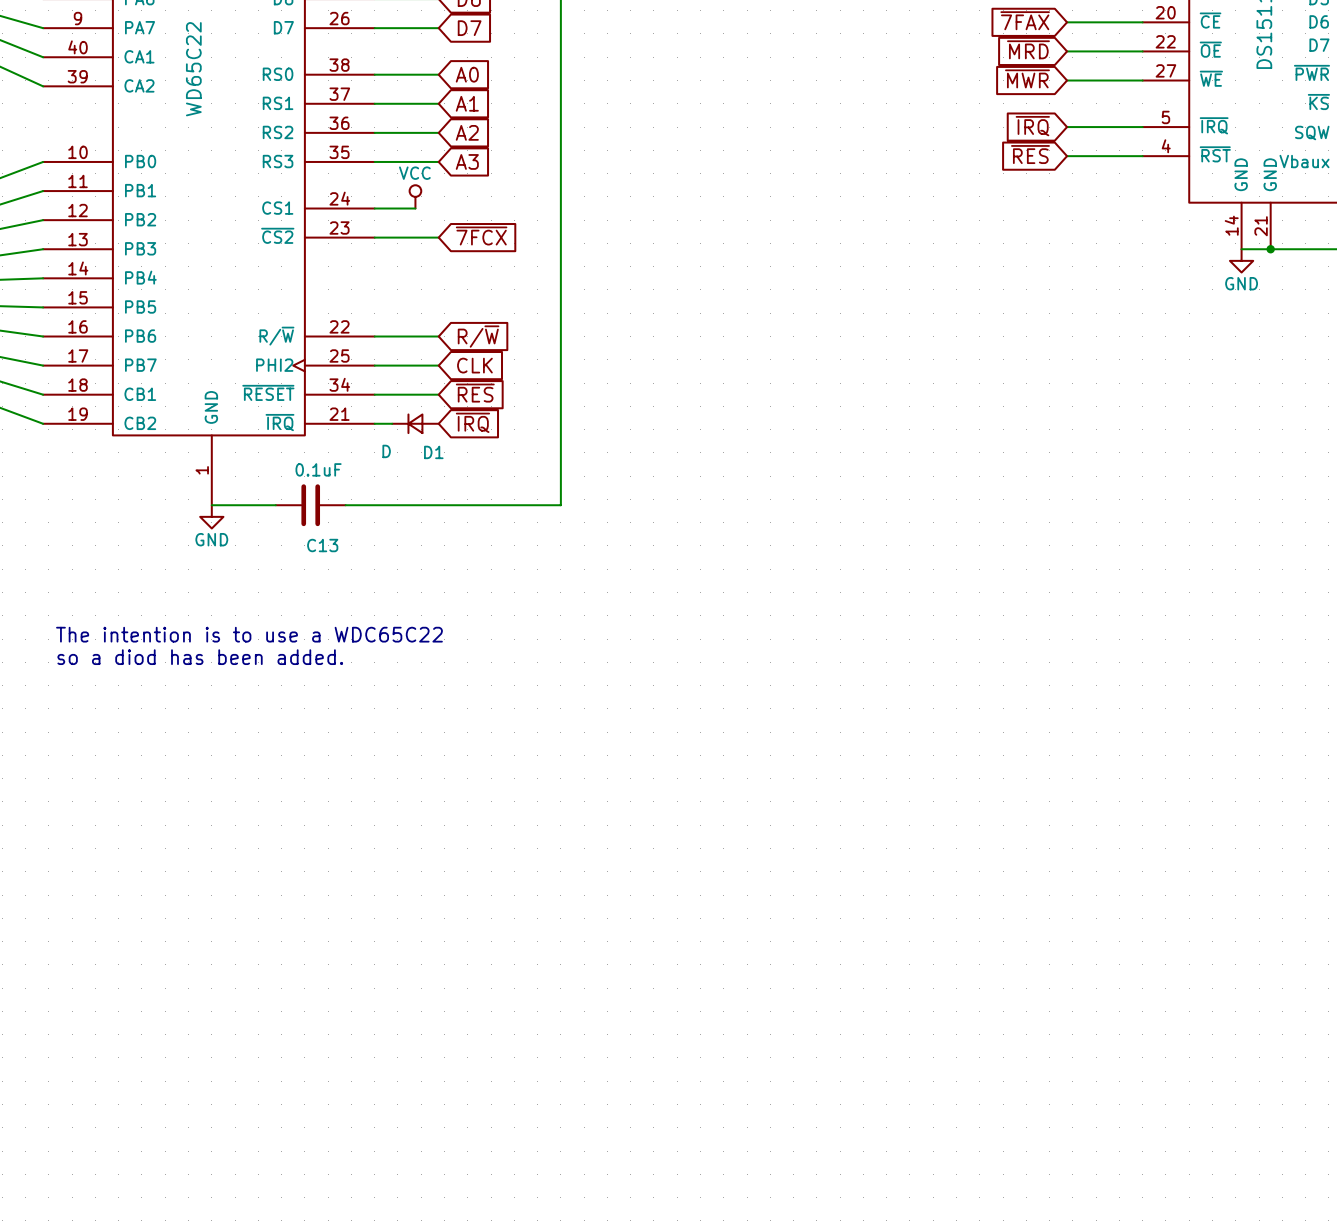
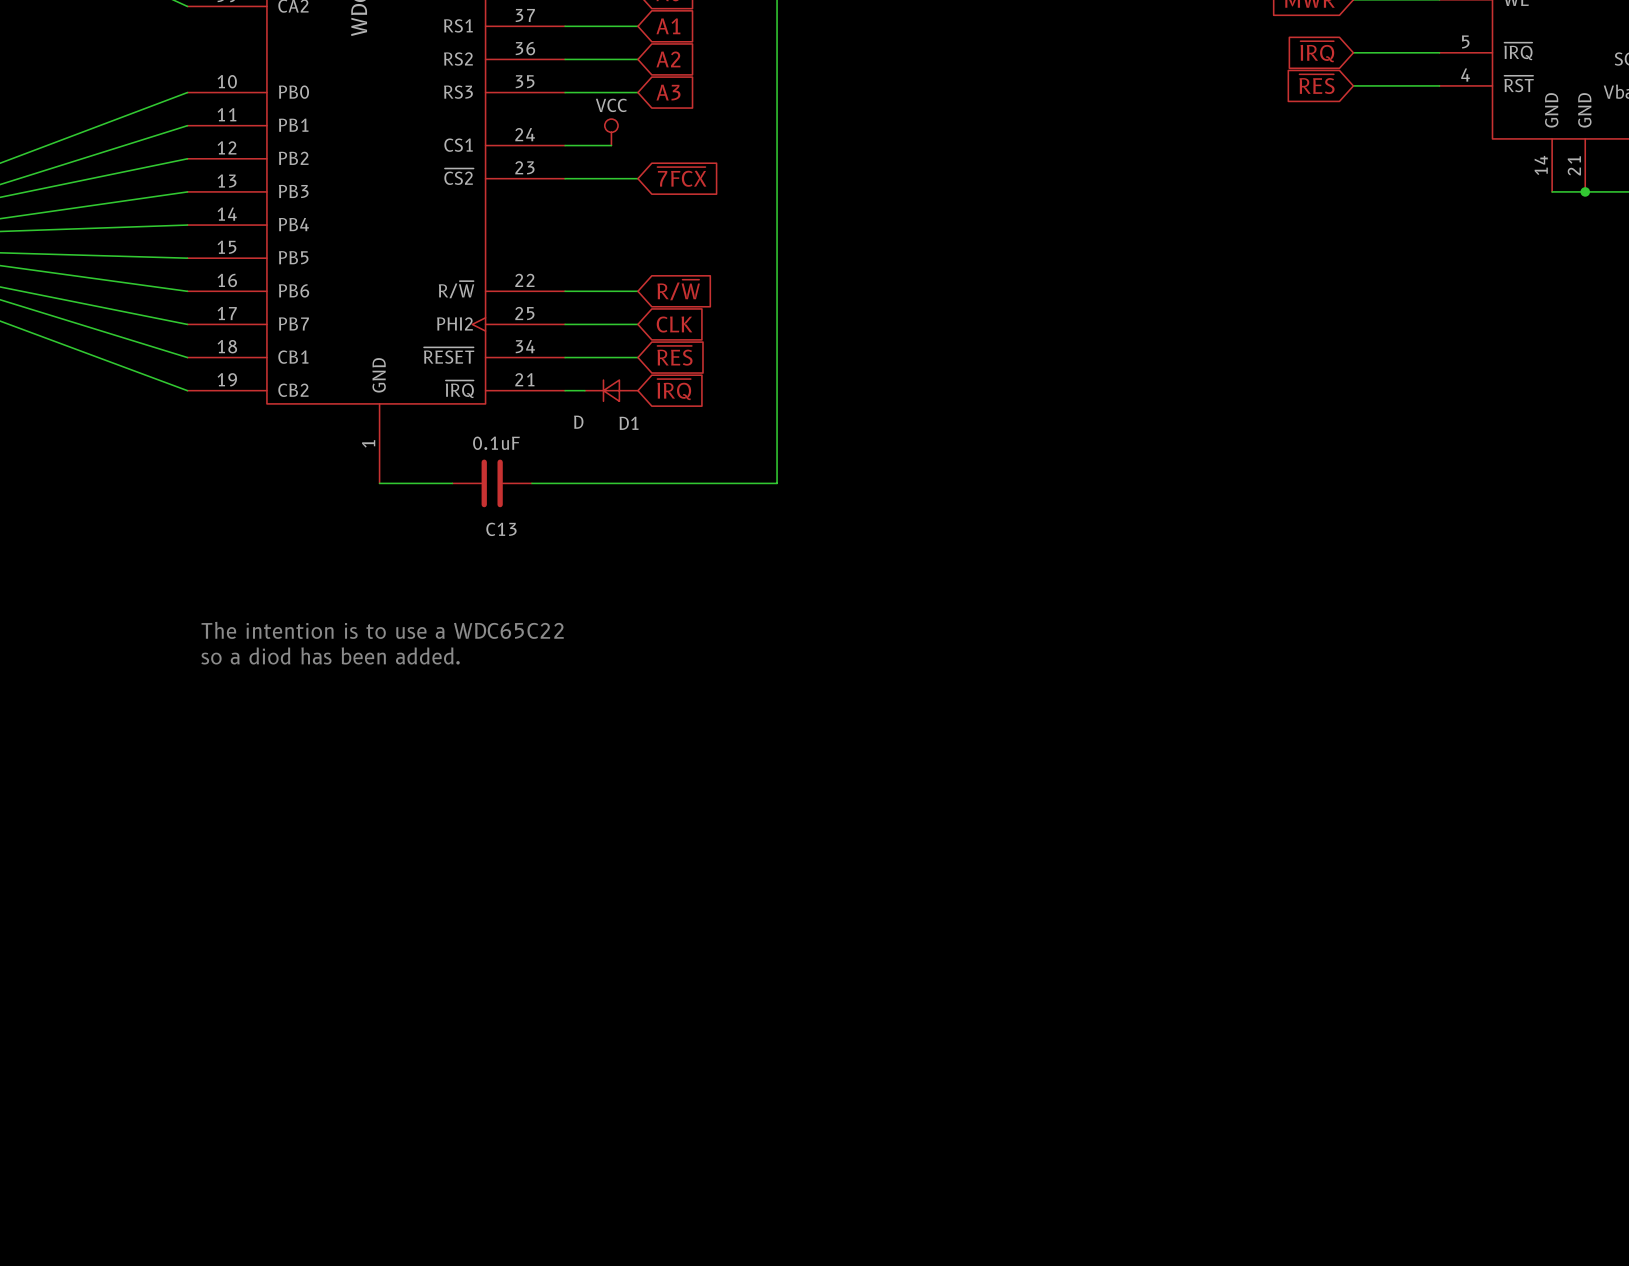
power symbol: GND (1241, 260) -> none
power symbol: GND (211, 516) -> none

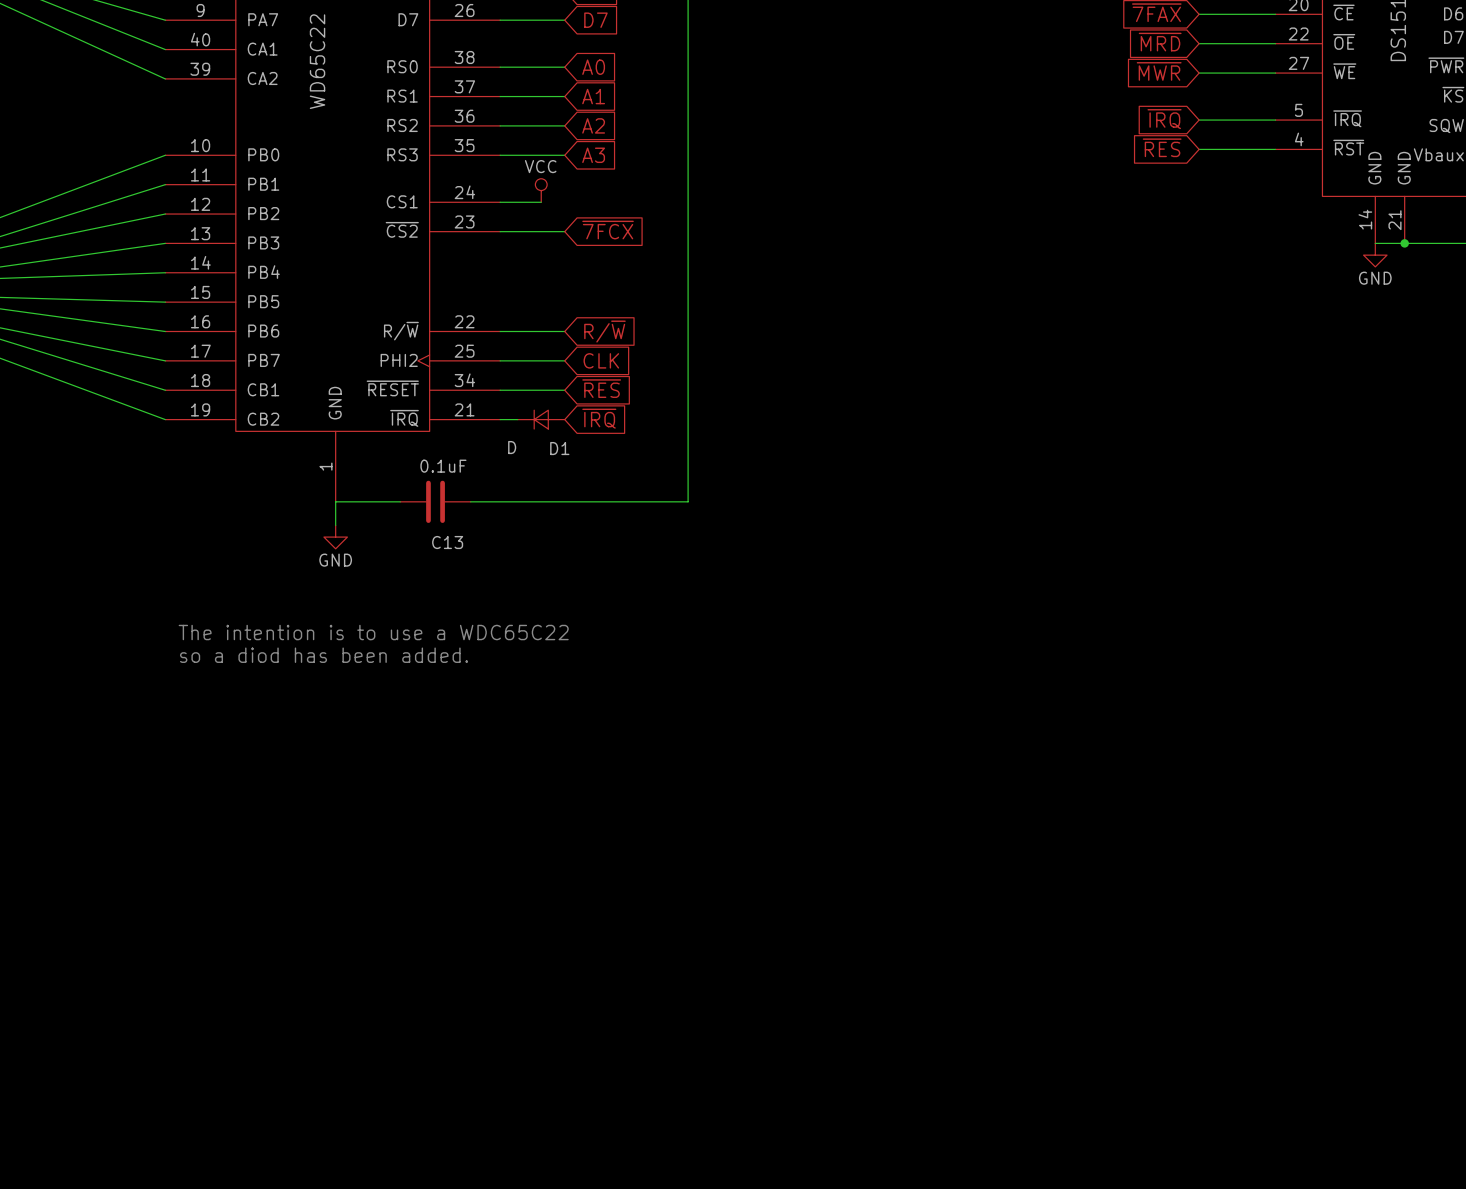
power symbol: none -> GND (1375, 255)
wire: none -> (335, 501) (335, 525)
power symbol: none -> GND (335, 537)

